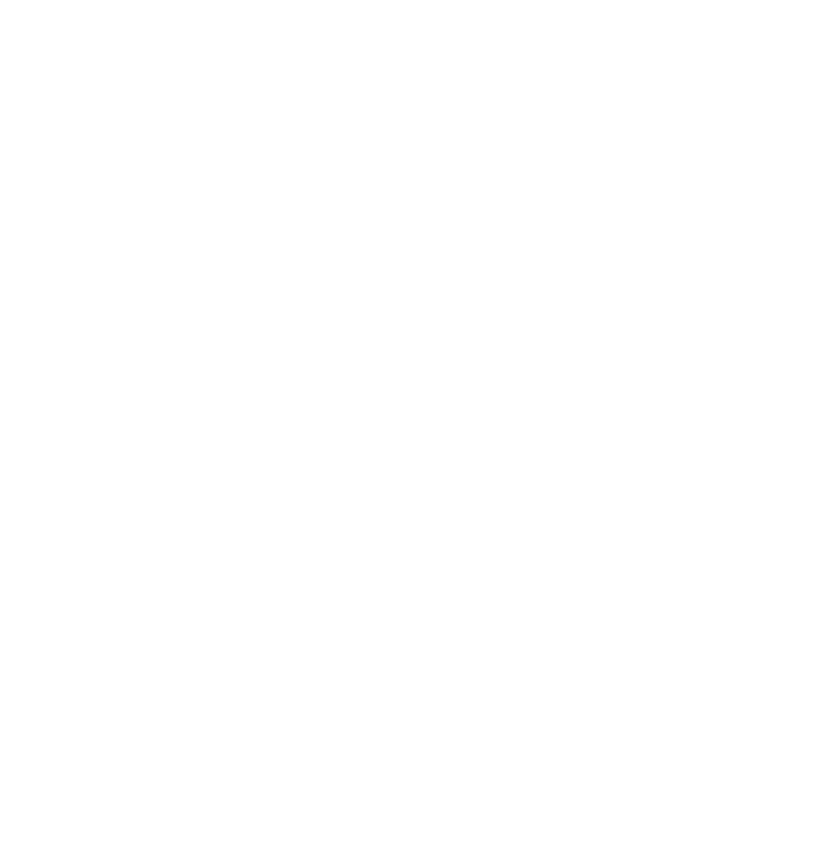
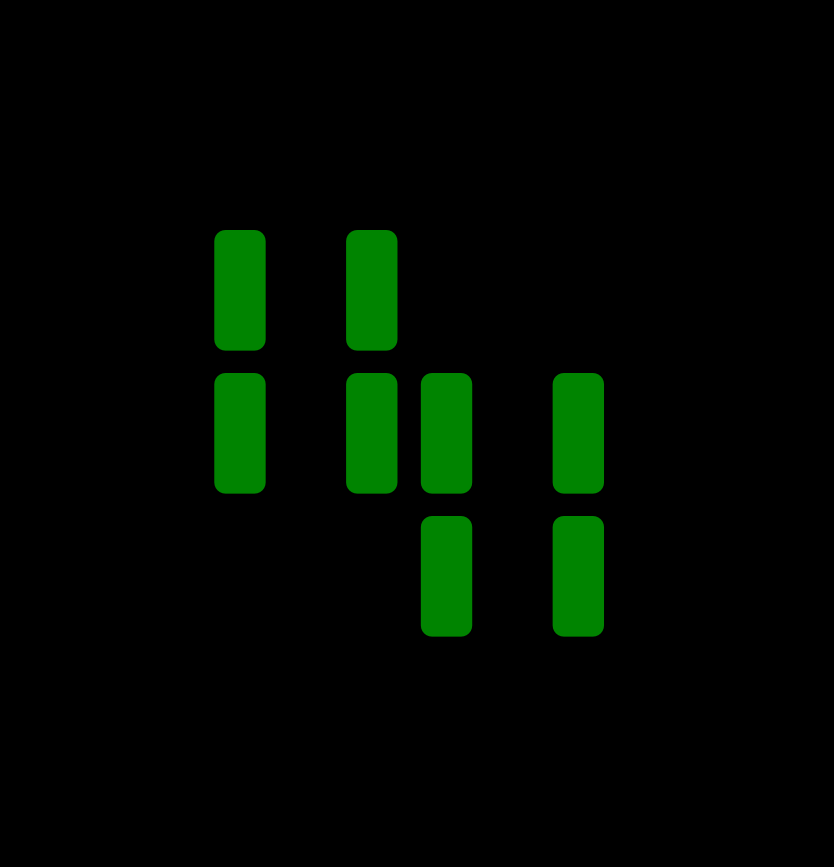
part: none -> (305, 290)
part: none -> (305, 433)
part: none -> (512, 433)
part: none -> (512, 576)

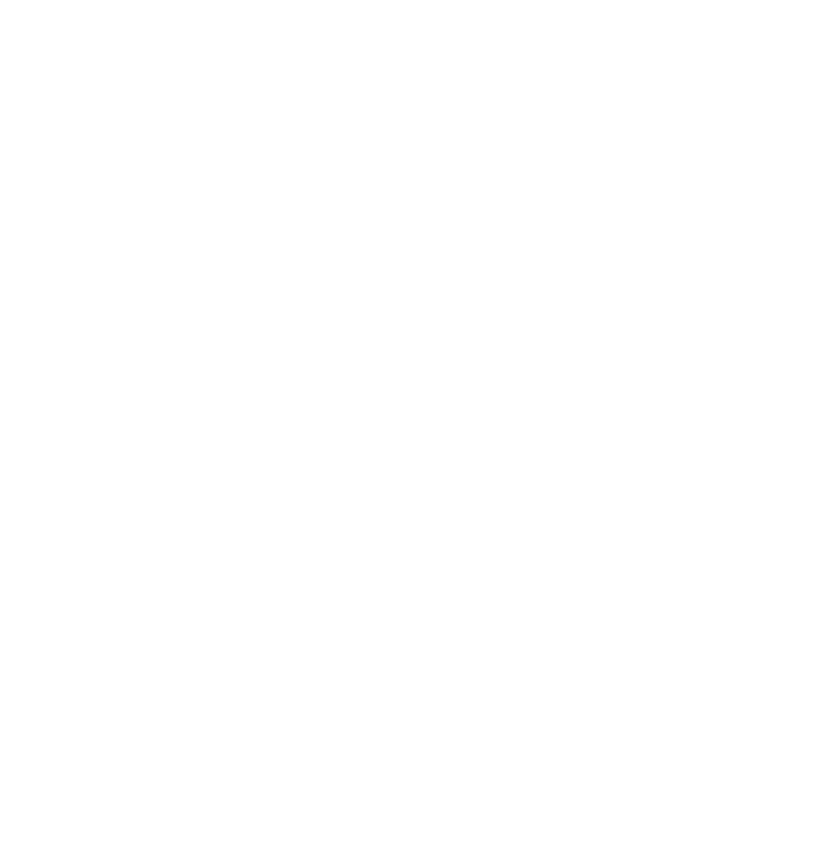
part: (305, 290) -> none
part: (305, 433) -> none
part: (512, 433) -> none
part: (512, 576) -> none

